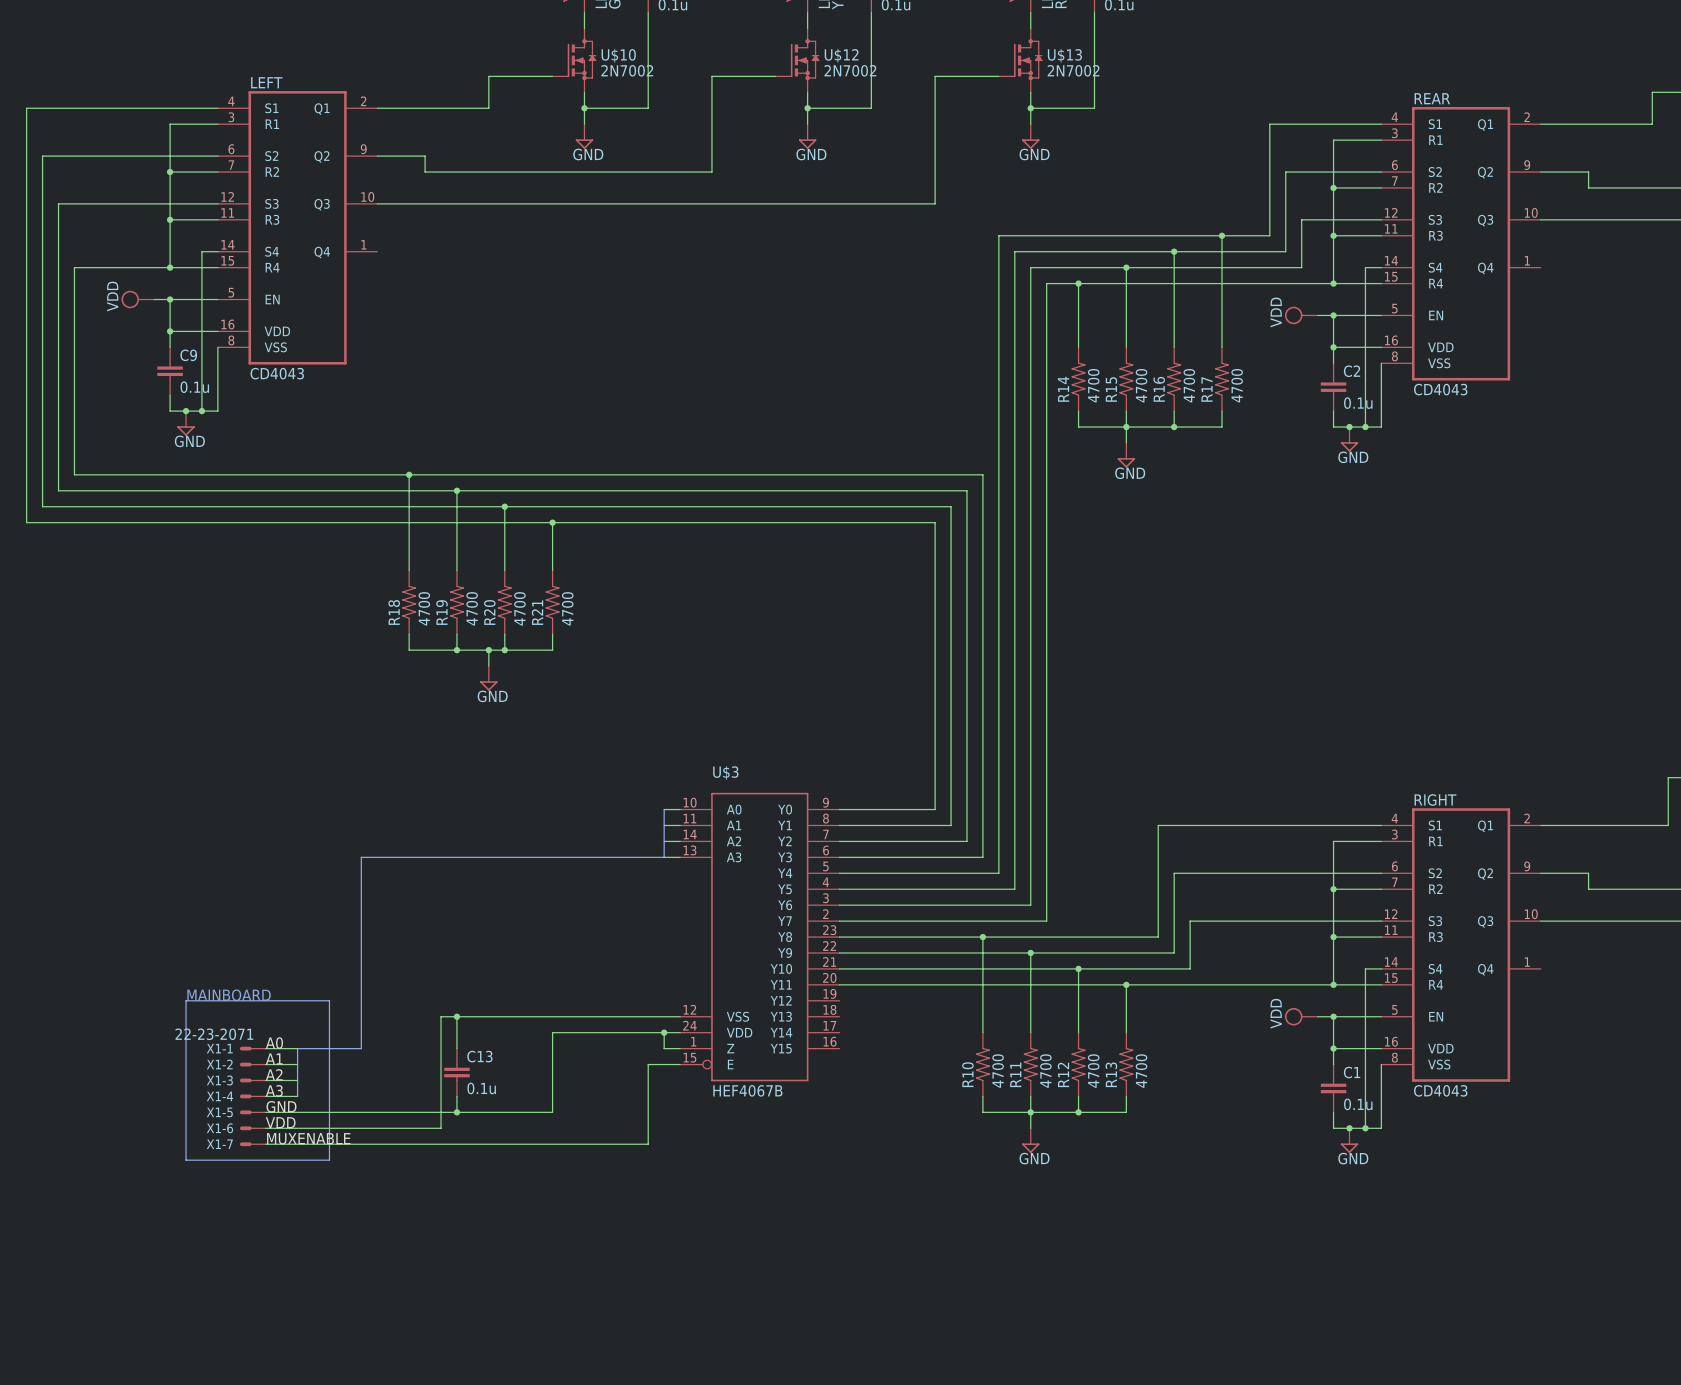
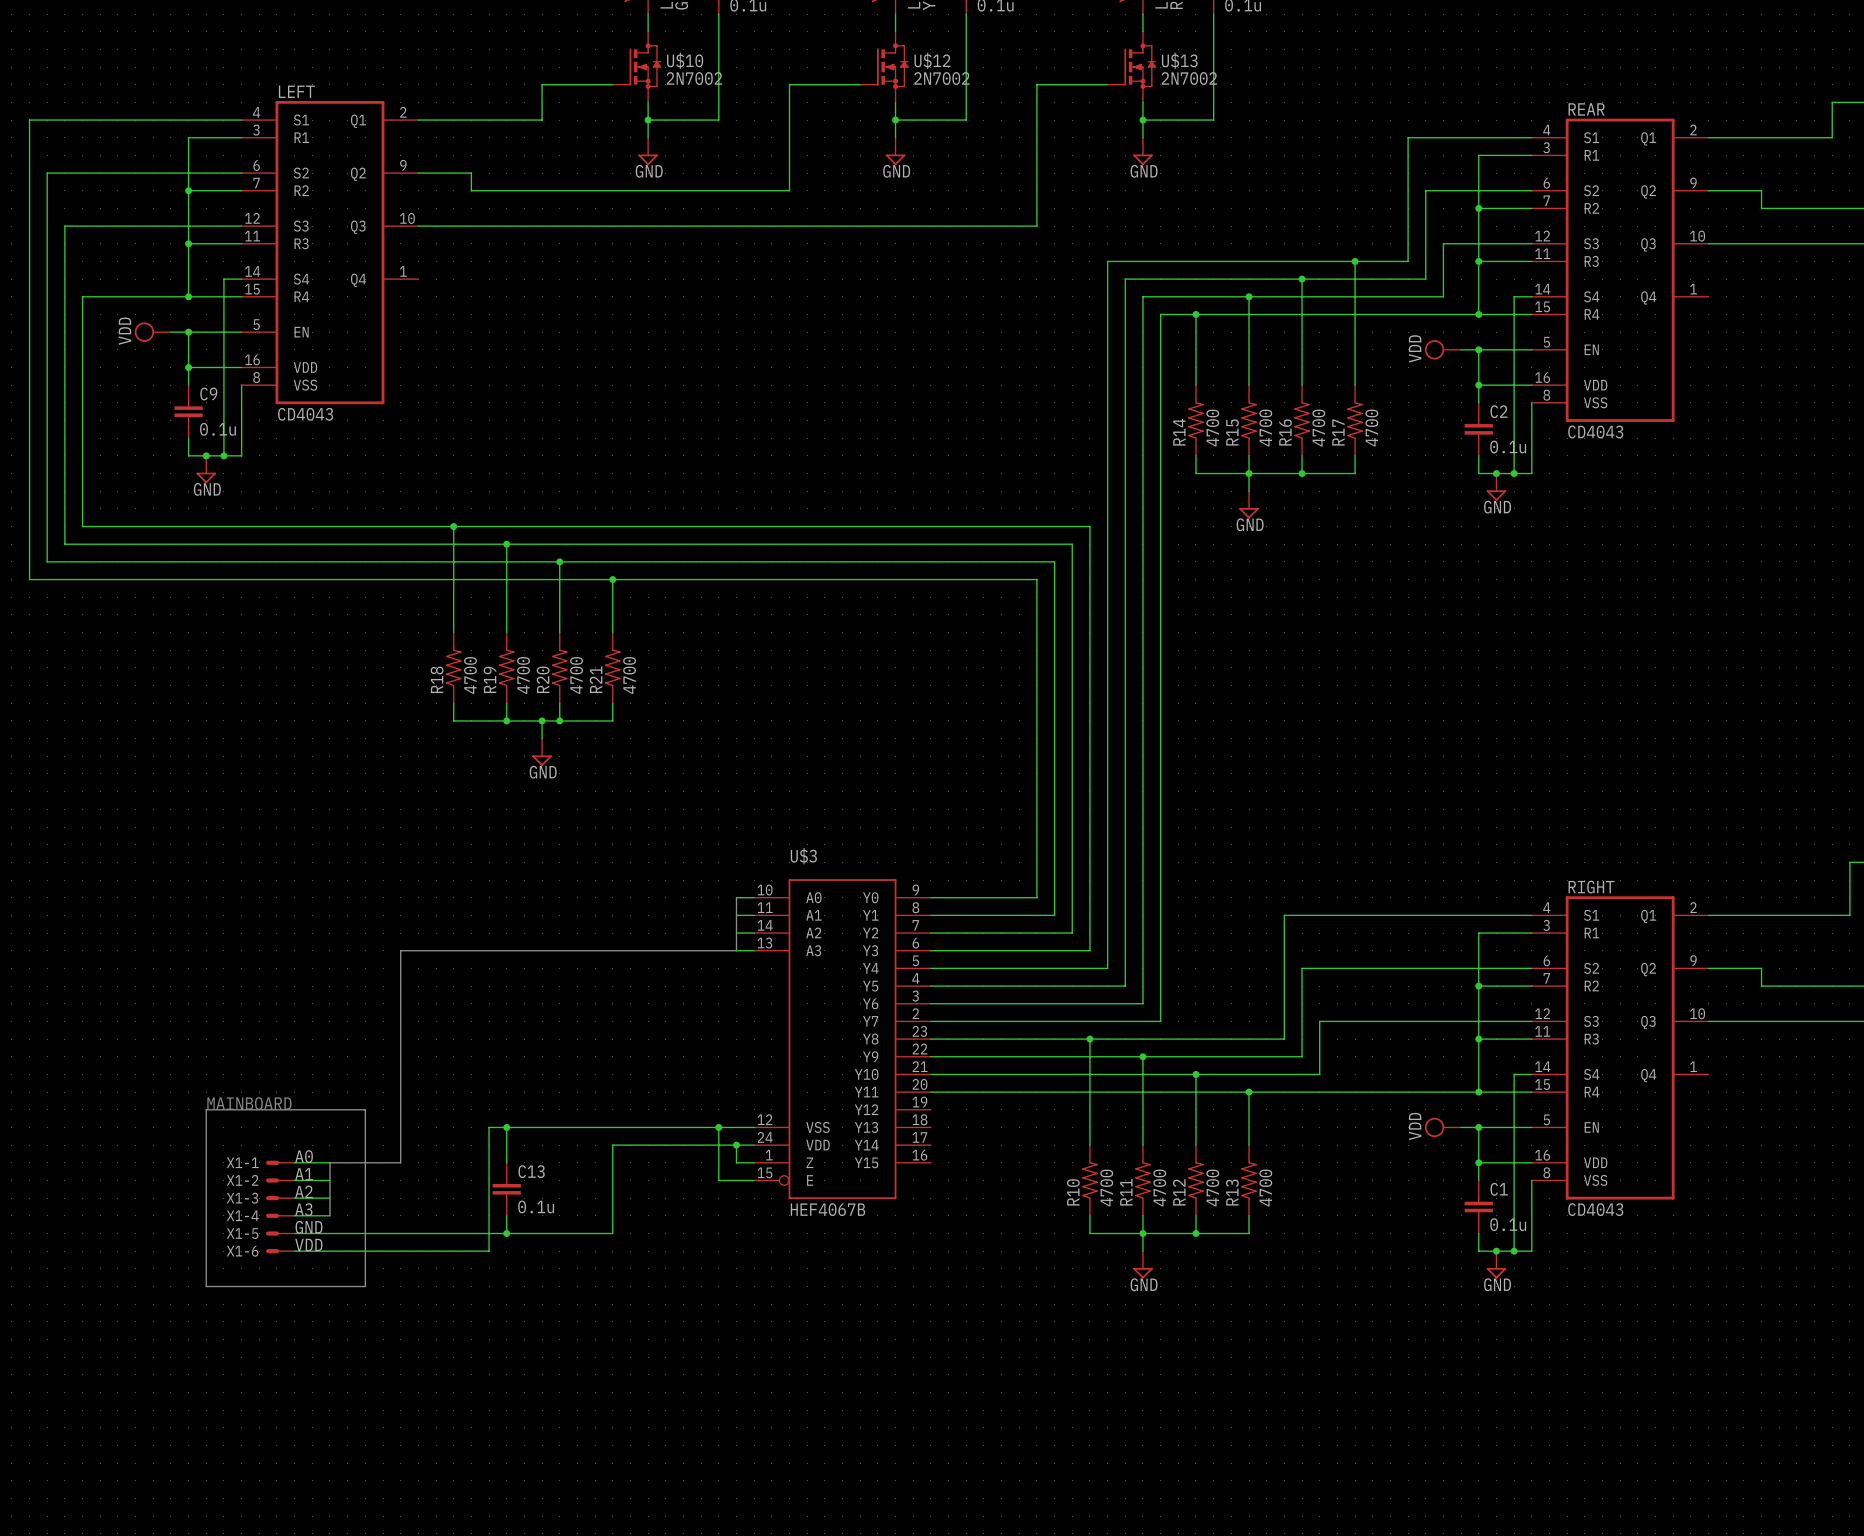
junction: none -> (718, 1127)
X1-1 value: 22-23-2071 (214, 1034) -> none
wire: (648, 1064) (648, 1144) (265, 1144) -> (718, 1180) (718, 1127)
label: MUXENABLE (308, 1138) -> none
X1-7: (252, 1144) -> none

